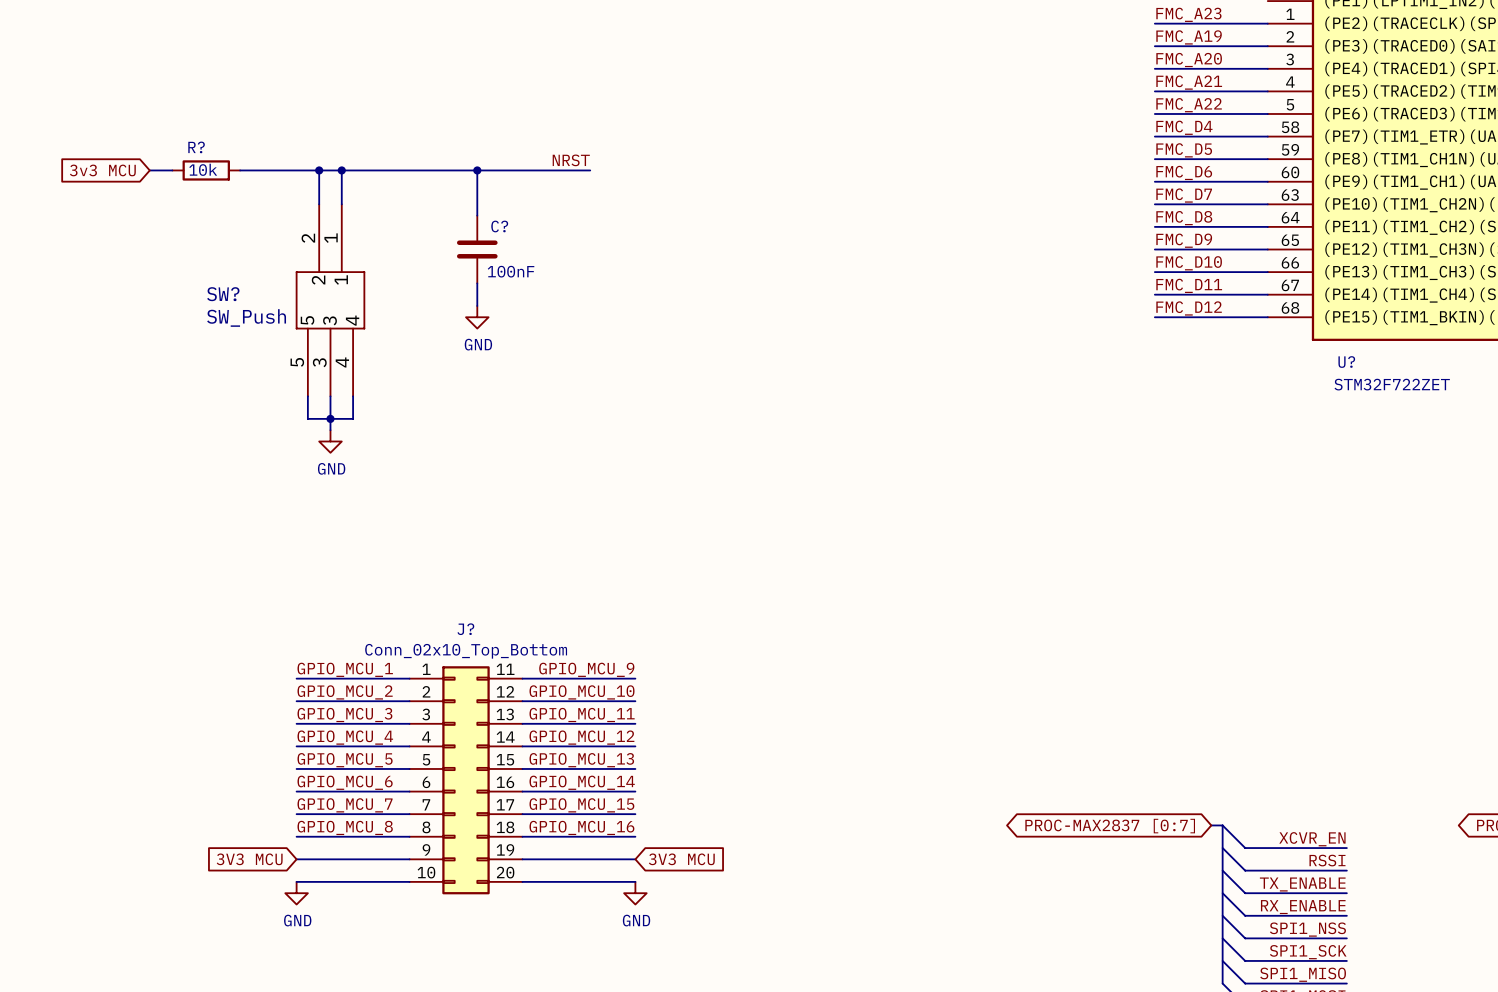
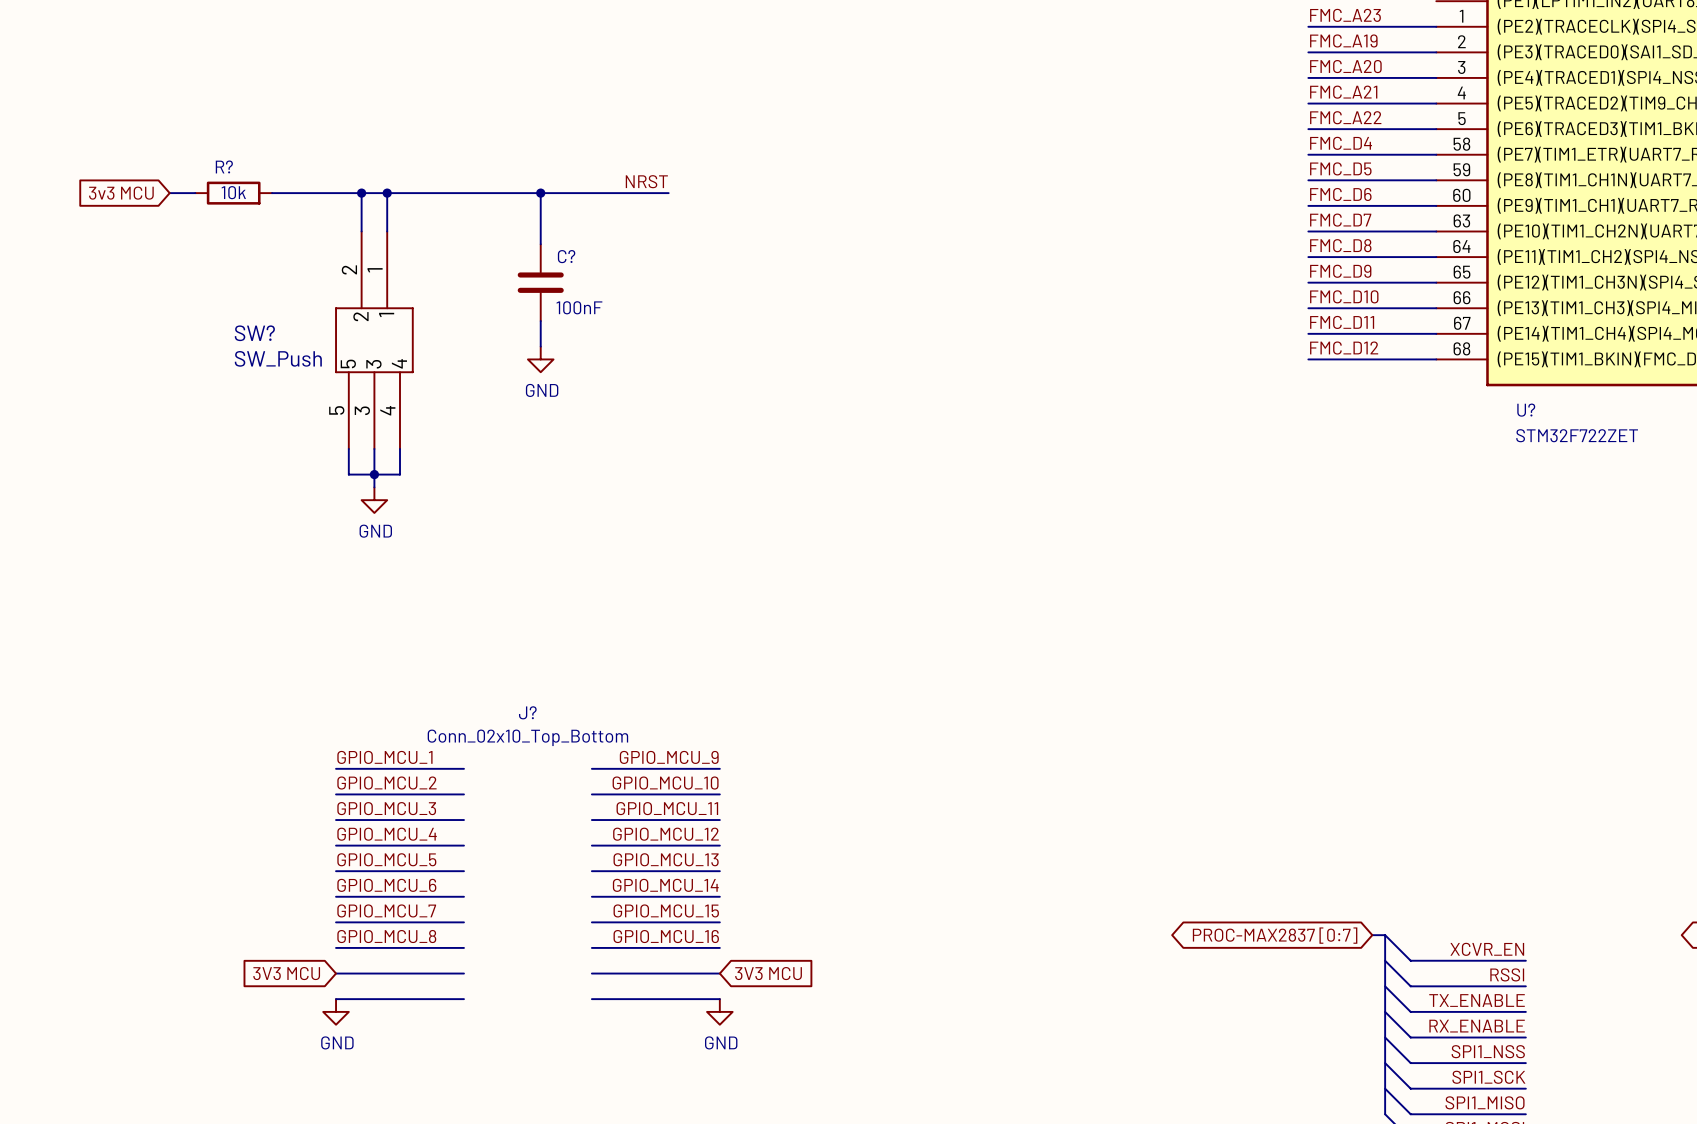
J?: Conn_02x10_Top_Bottom (466, 780) -> none

